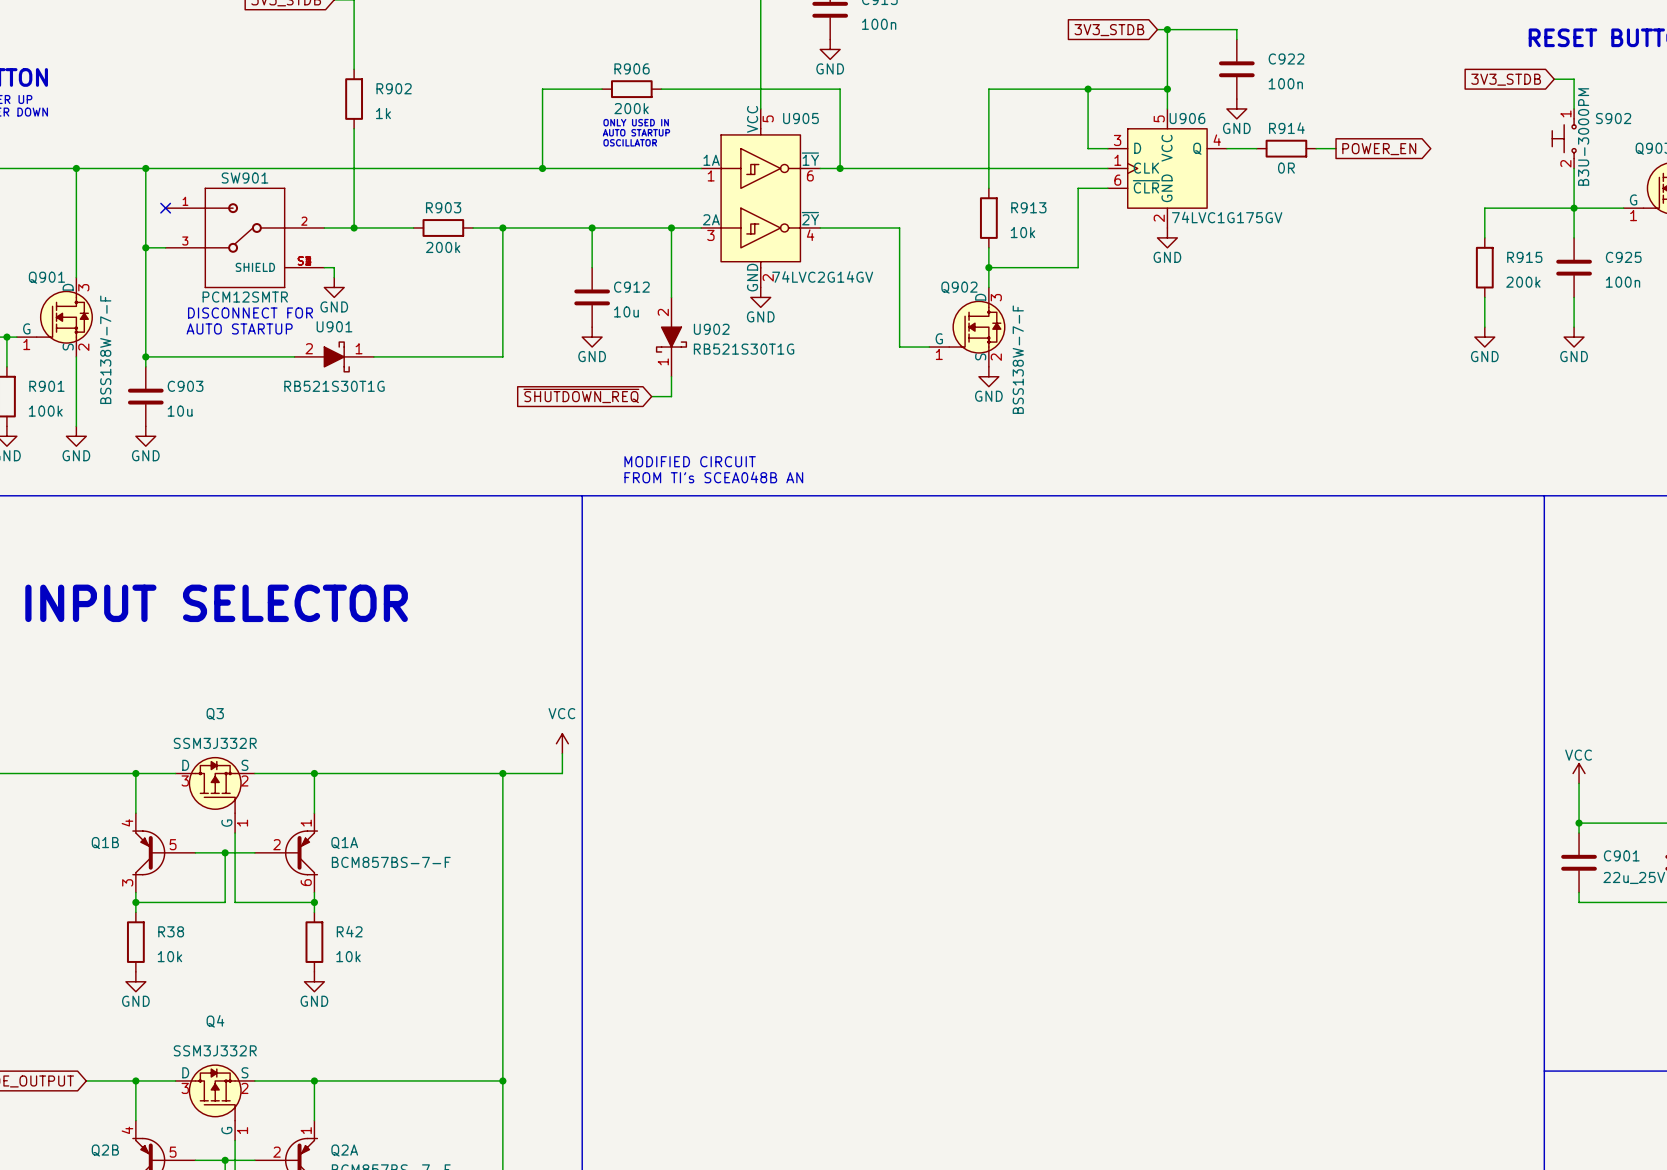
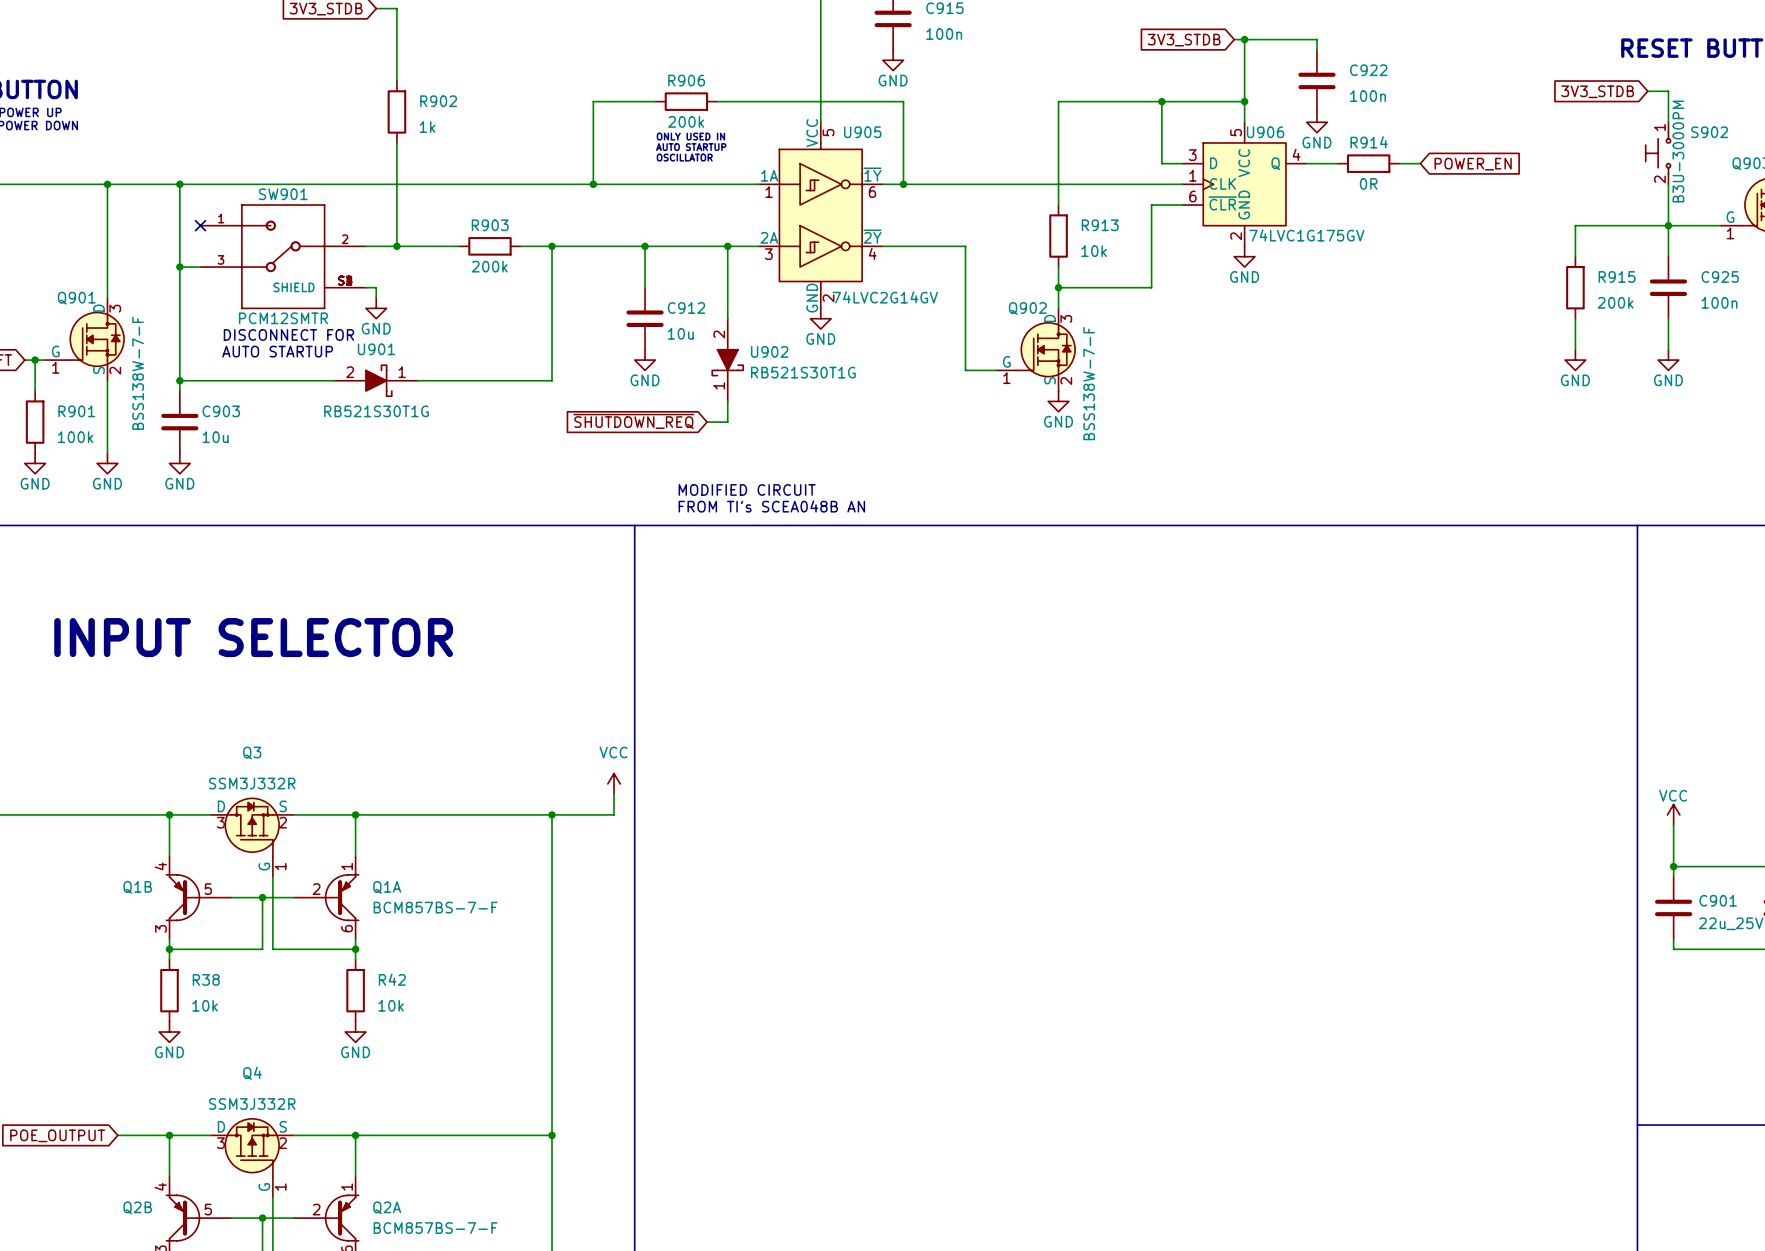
global label shape: output (1379, 149) -> input (1473, 164)

